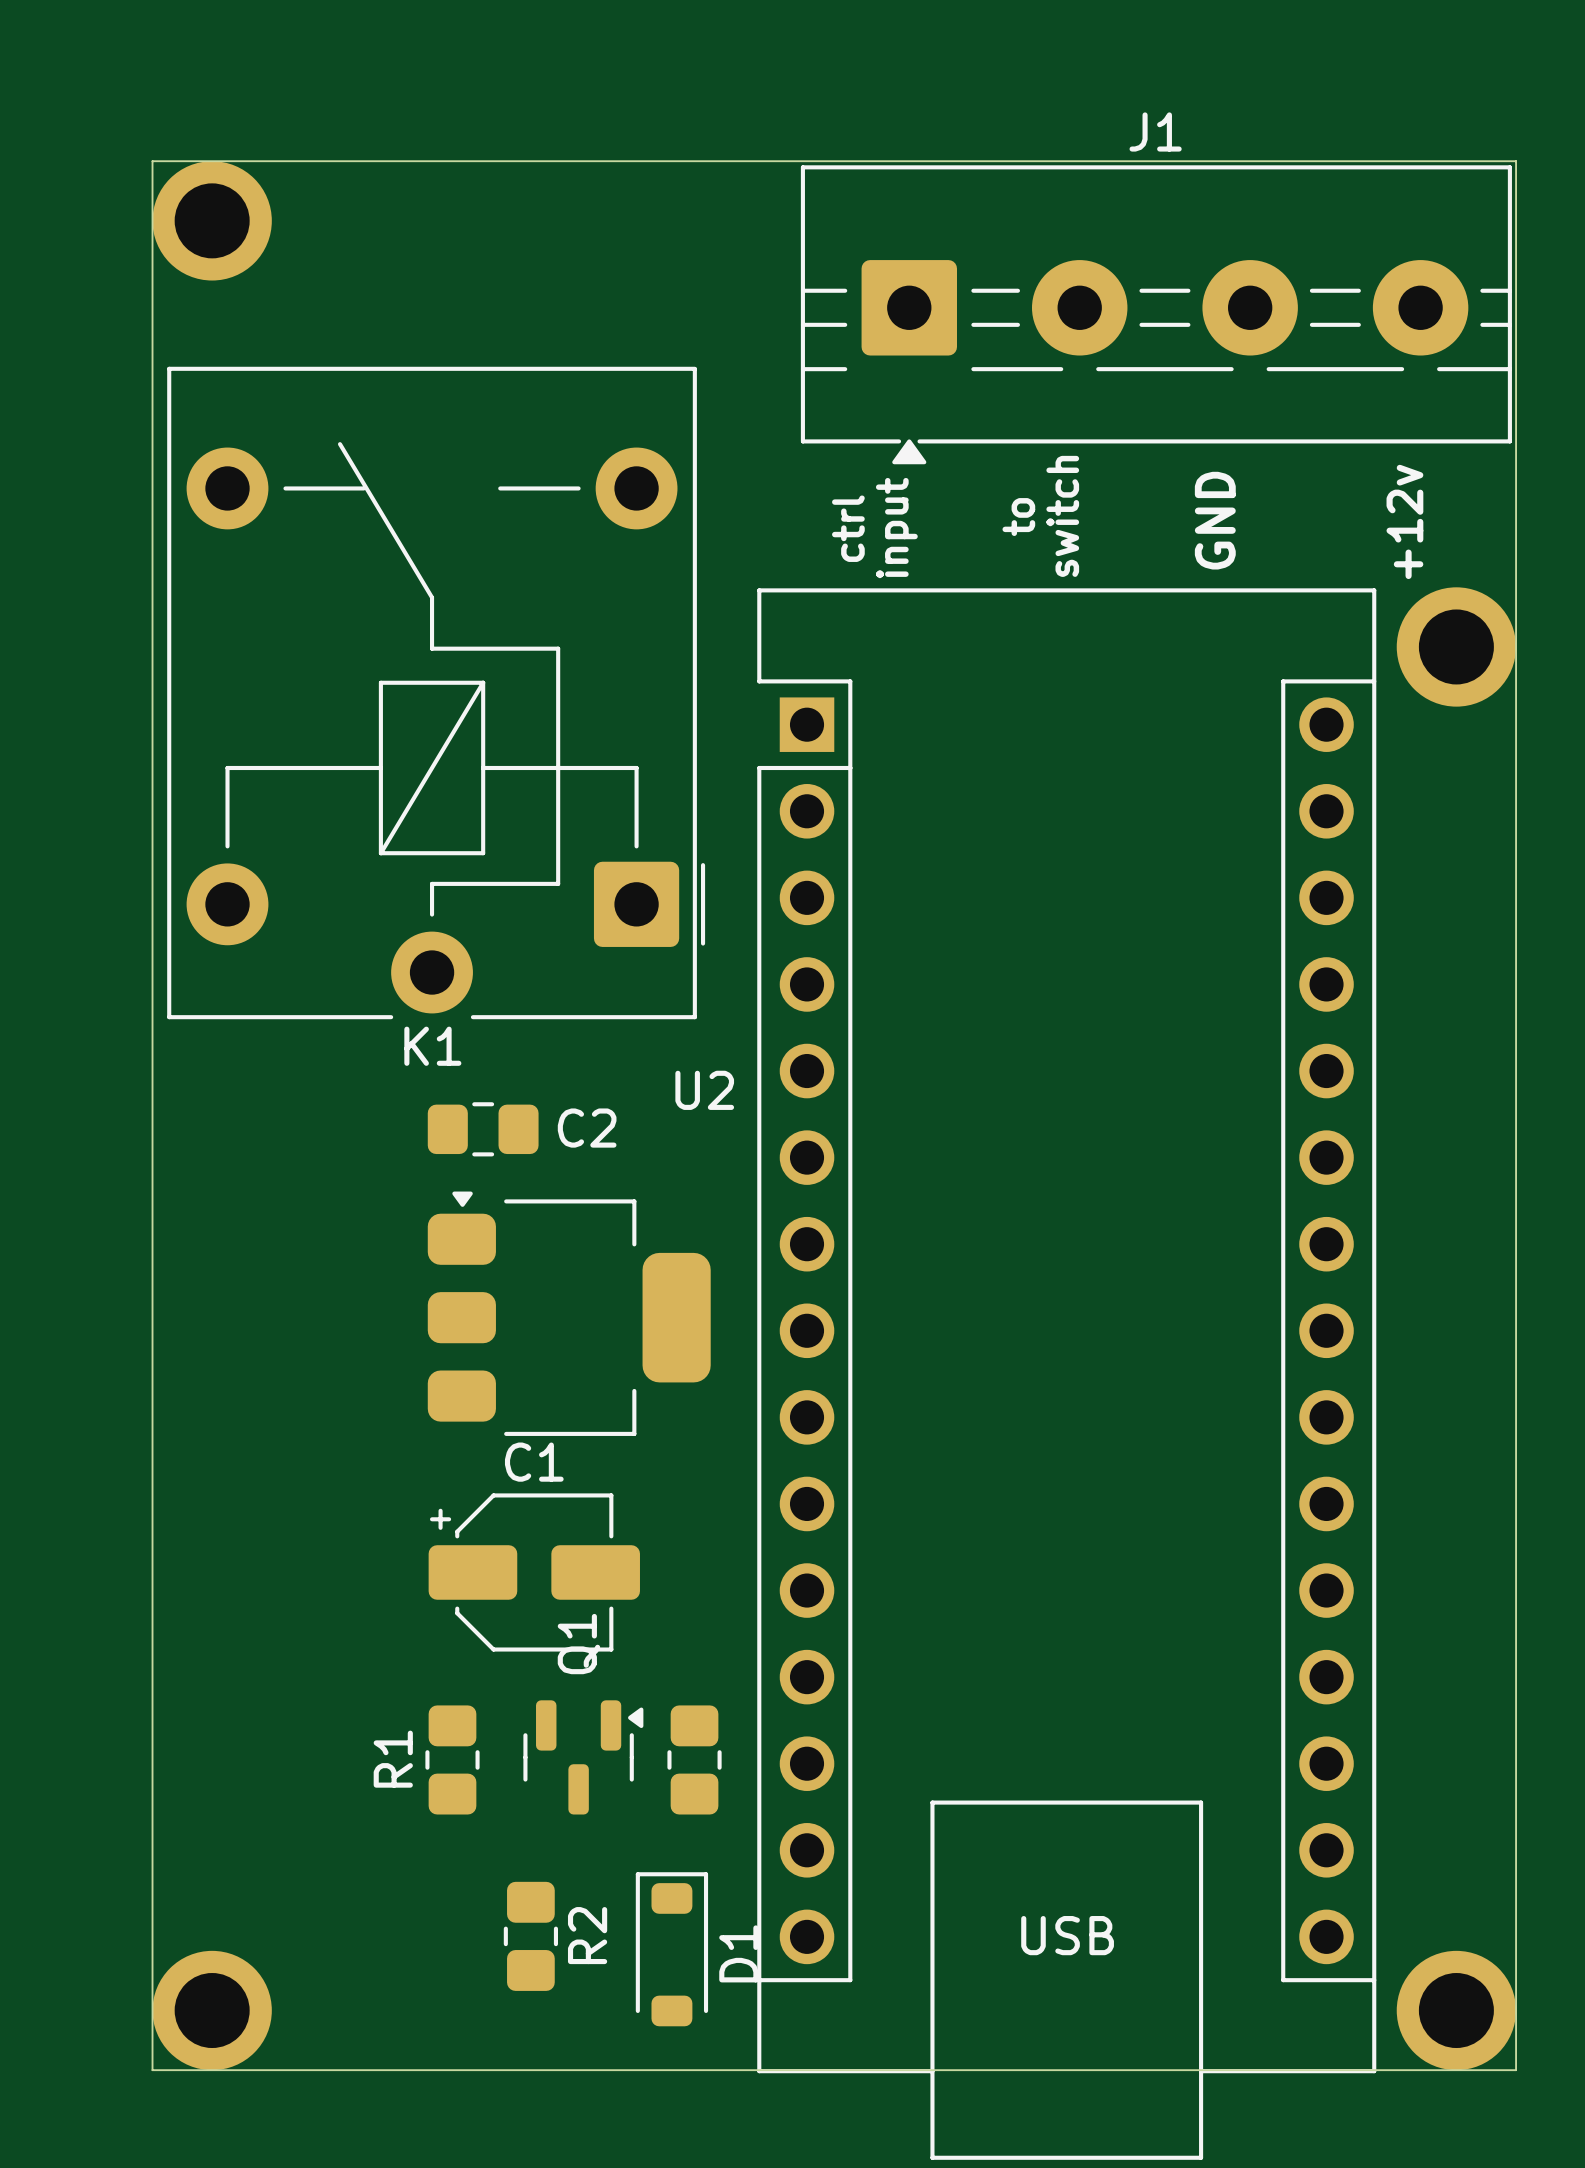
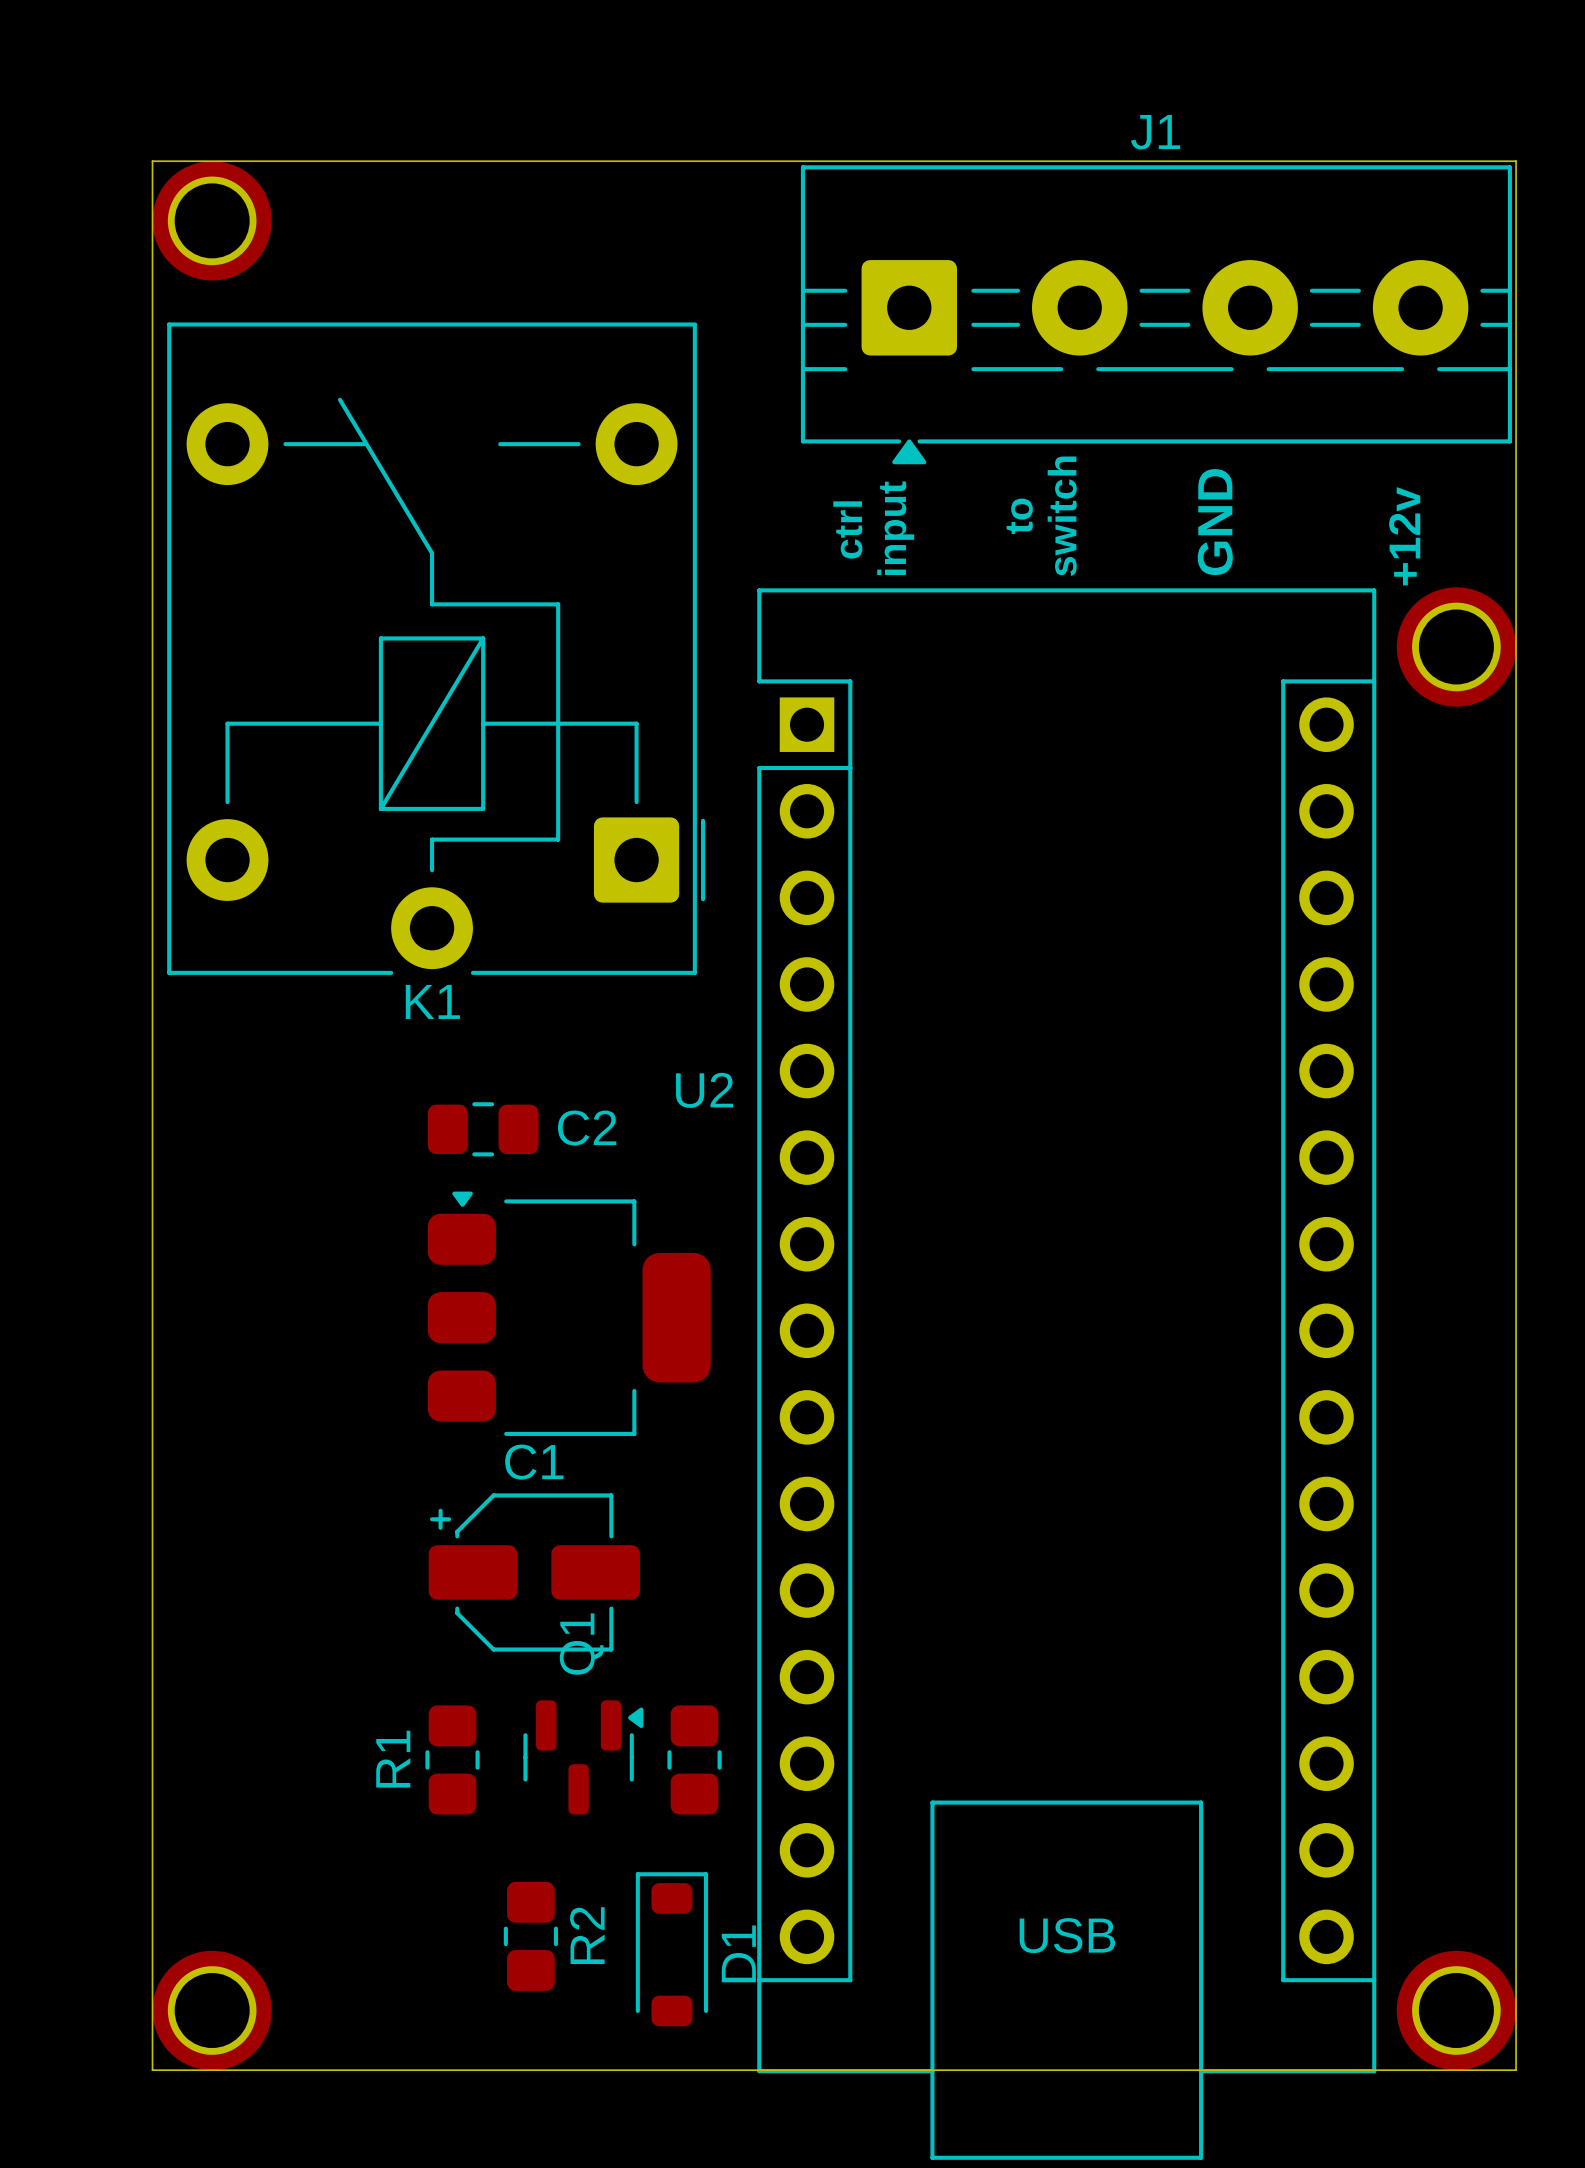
K1 position: (436, 692) -> (436, 648)

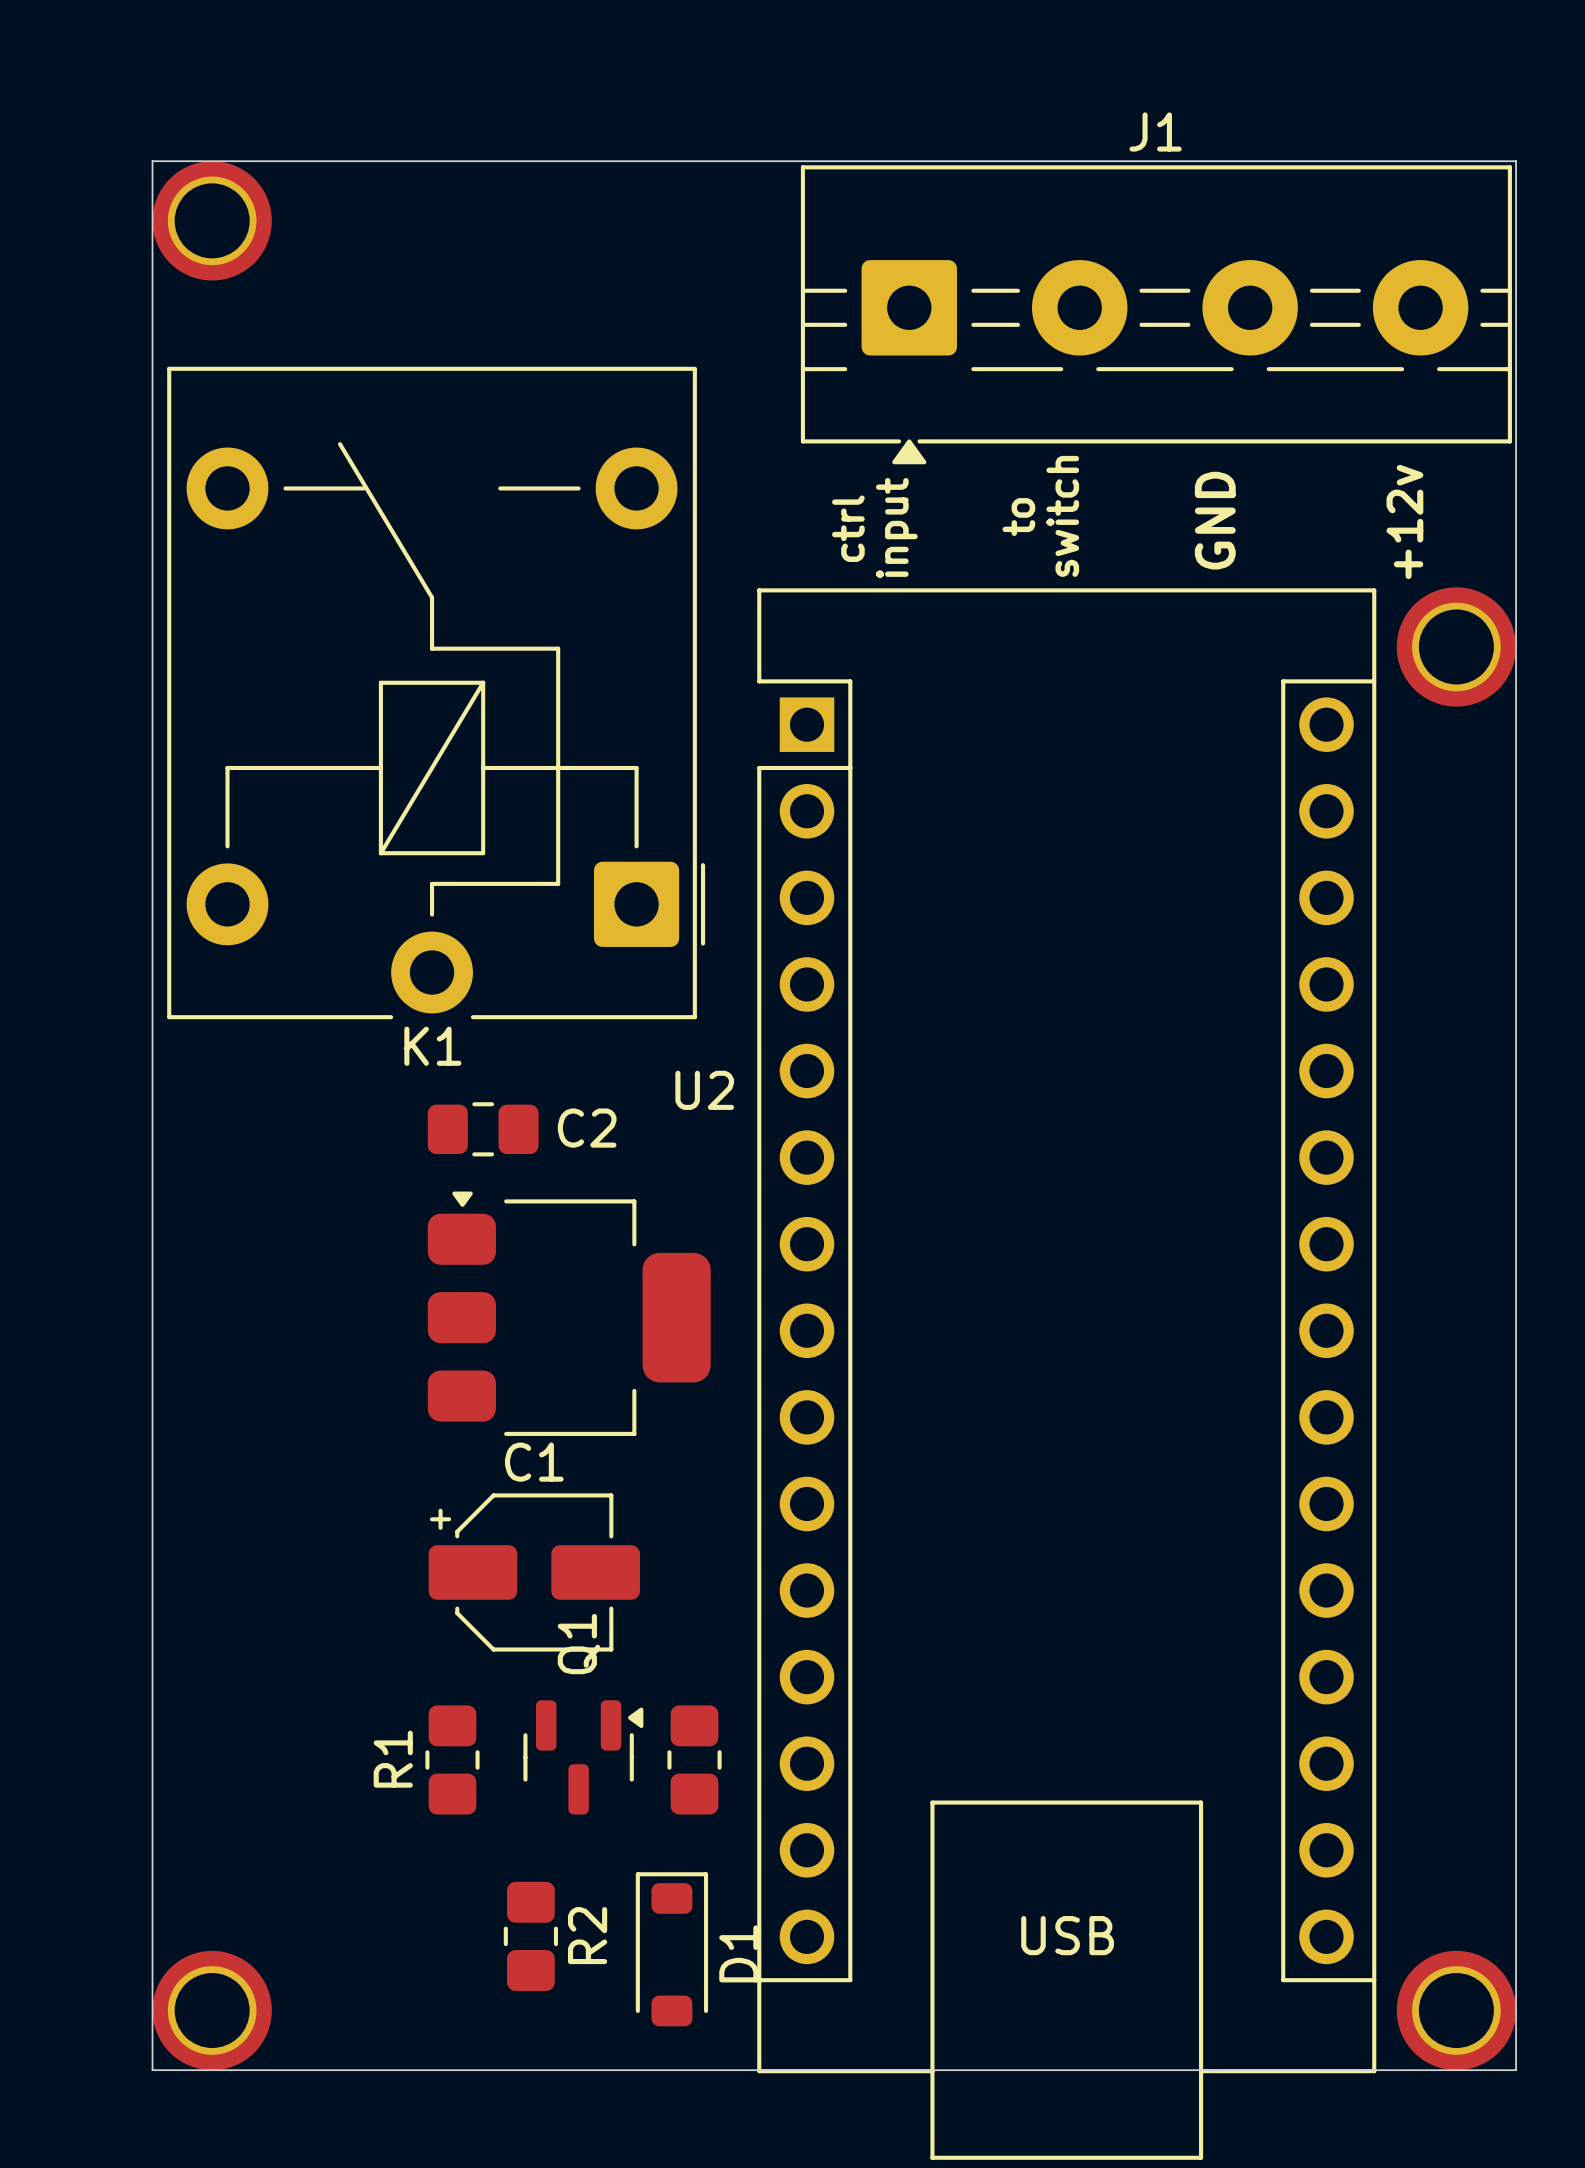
K1 position: (436, 648) -> (436, 692)

